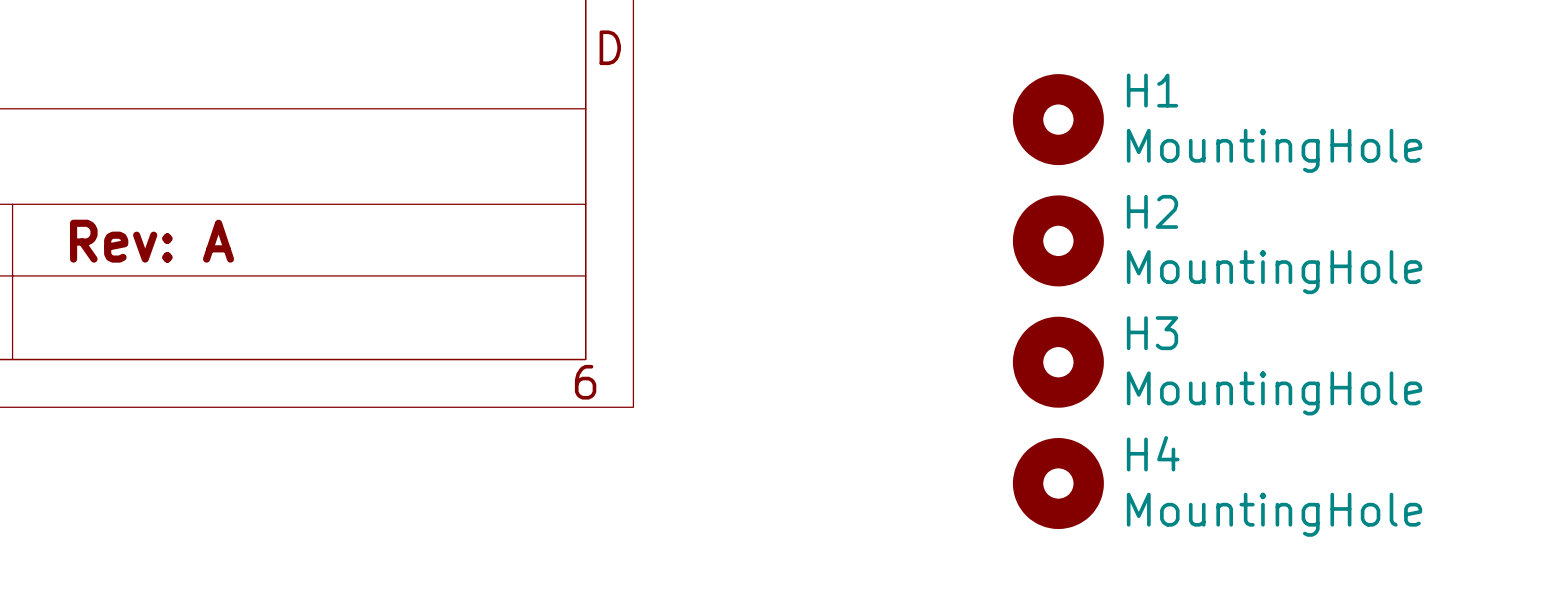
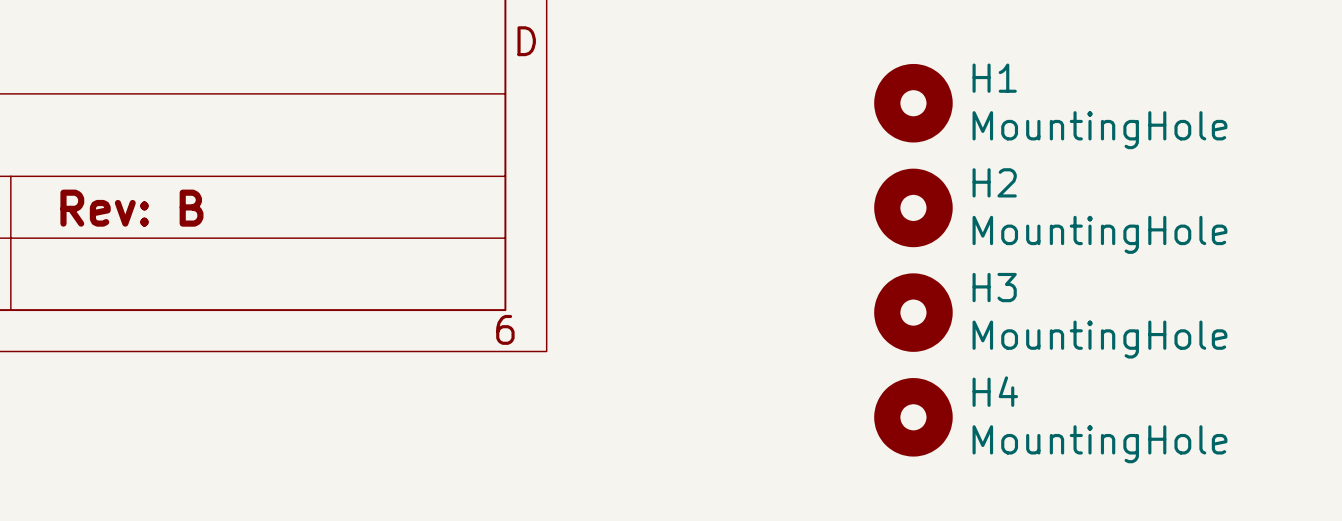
title block: Rev: A (152, 241) -> Rev: B (131, 208)

